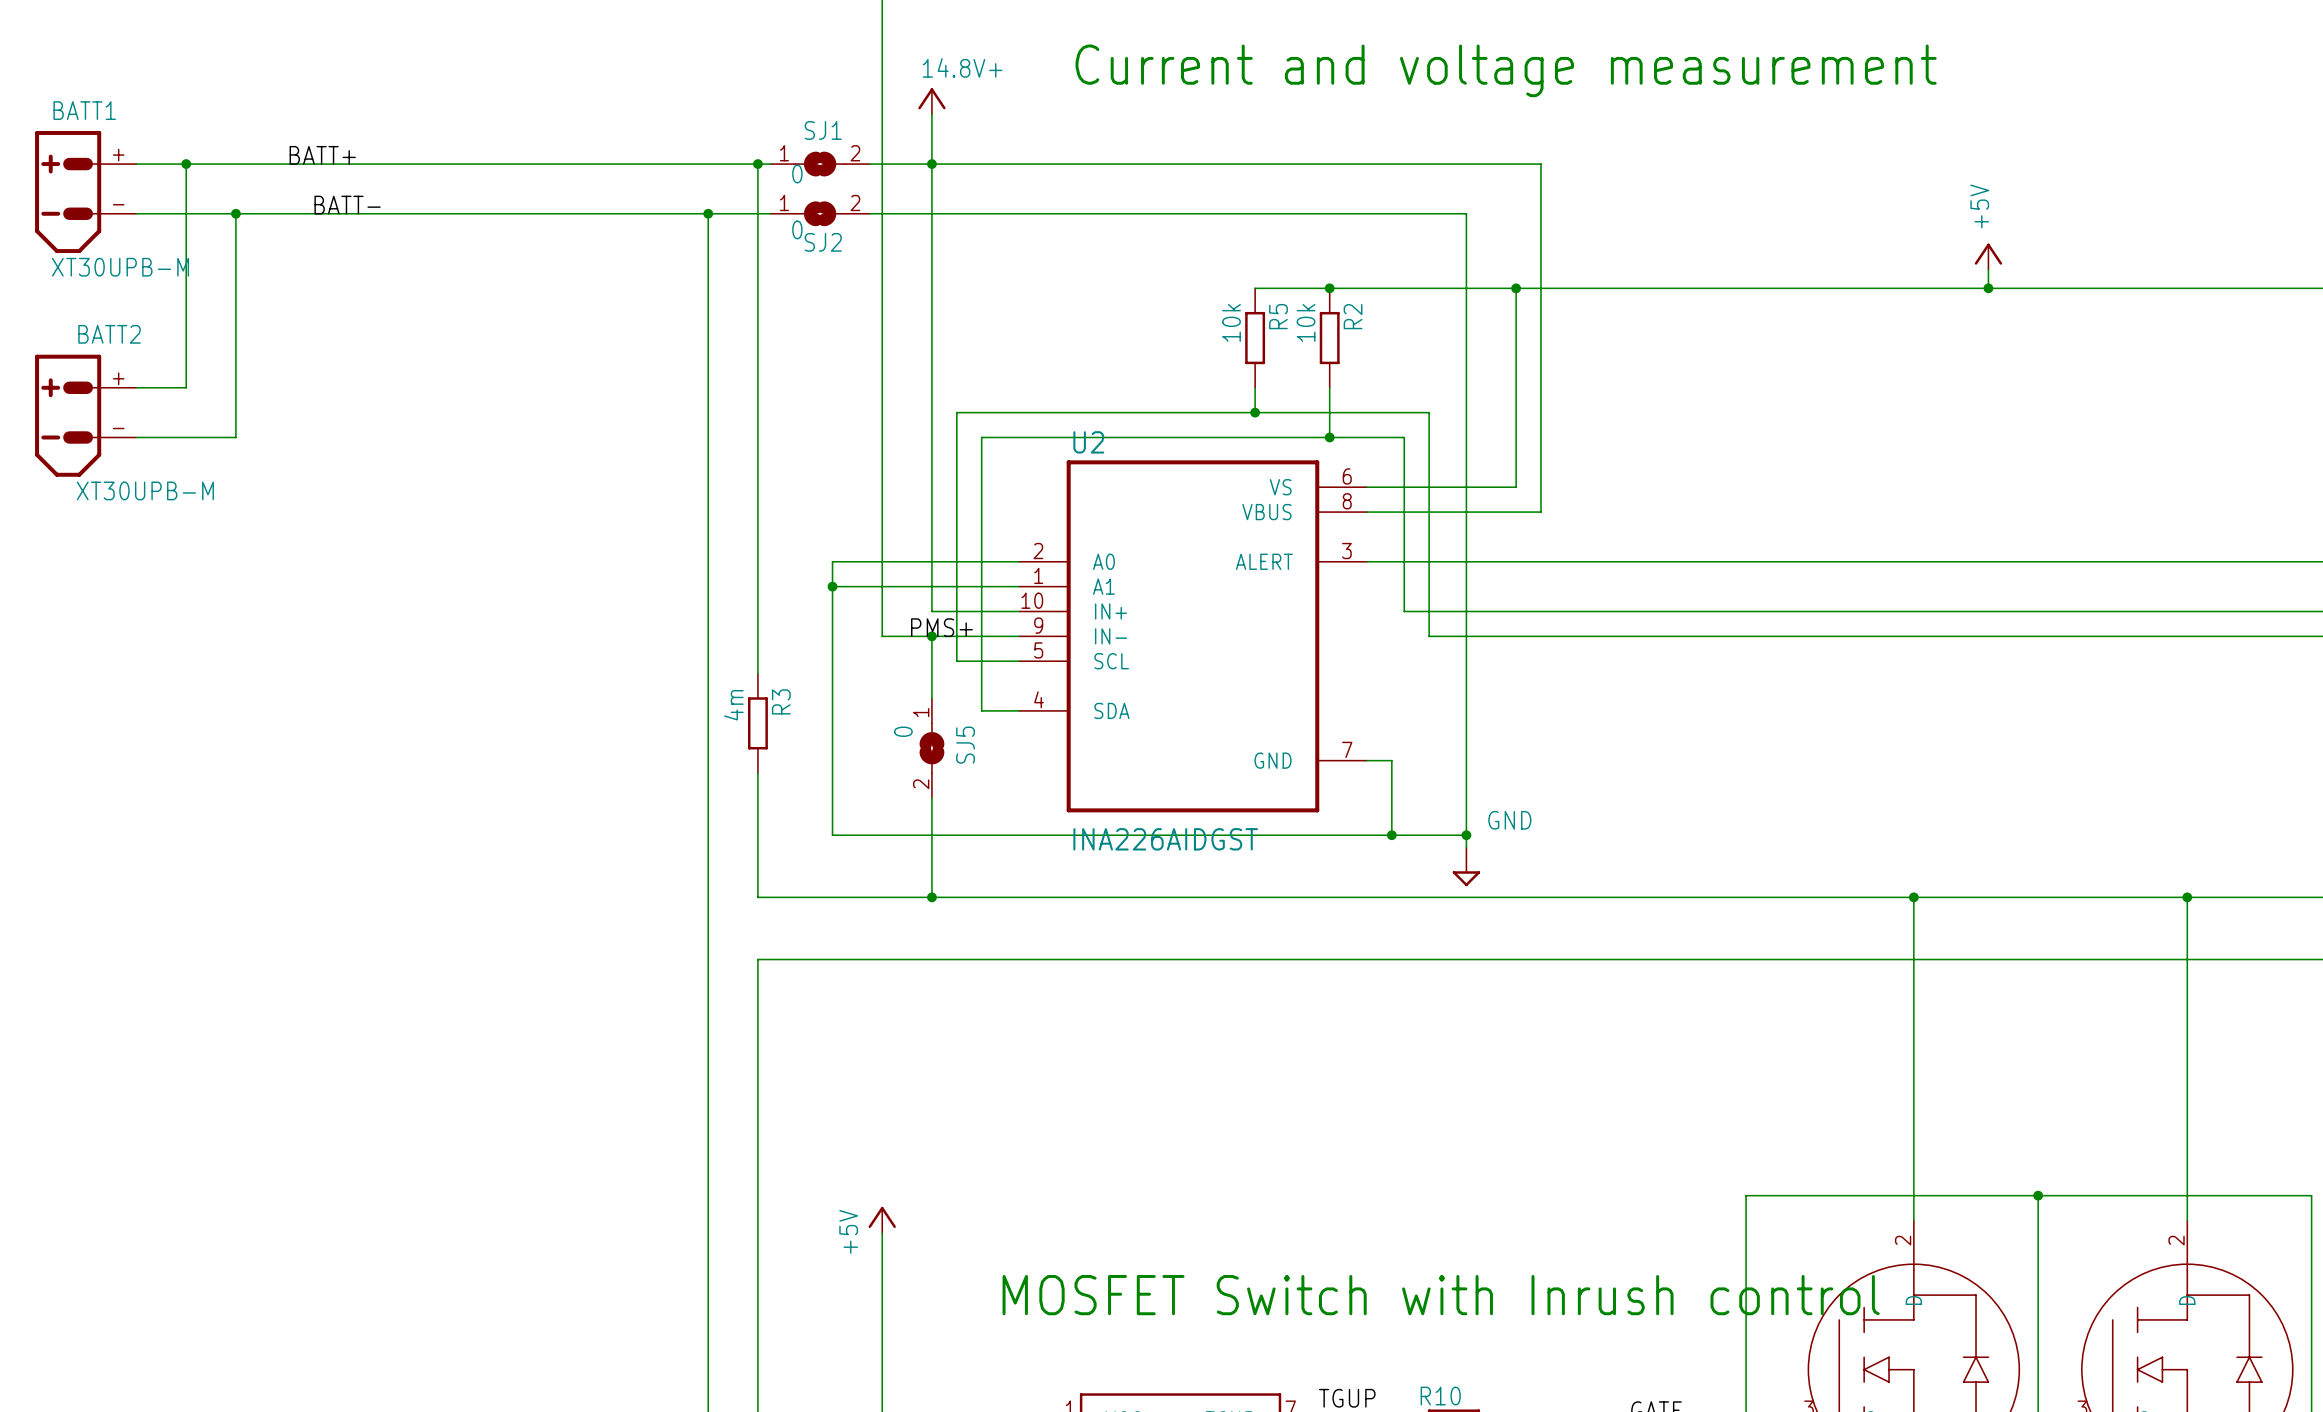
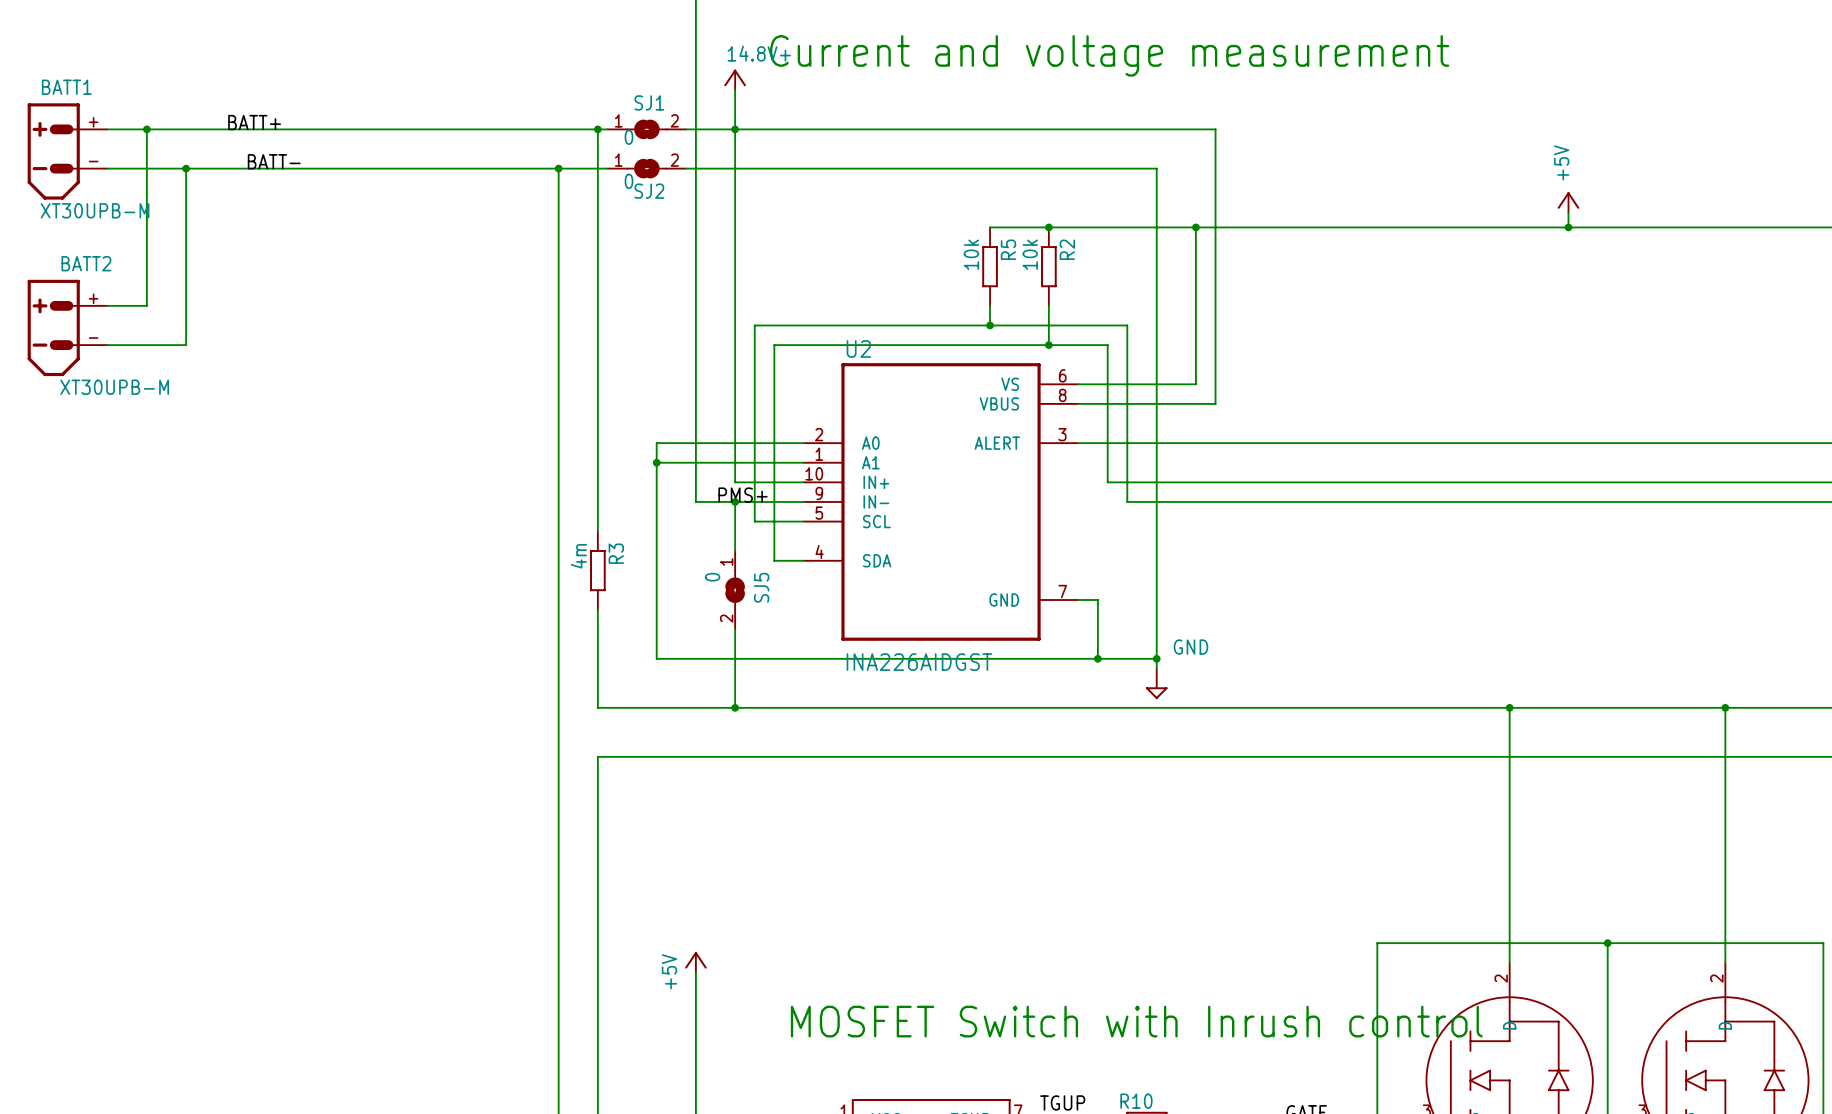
text position: Current and voltage measurement (1506, 70) -> Current and voltage measurement (1109, 55)

